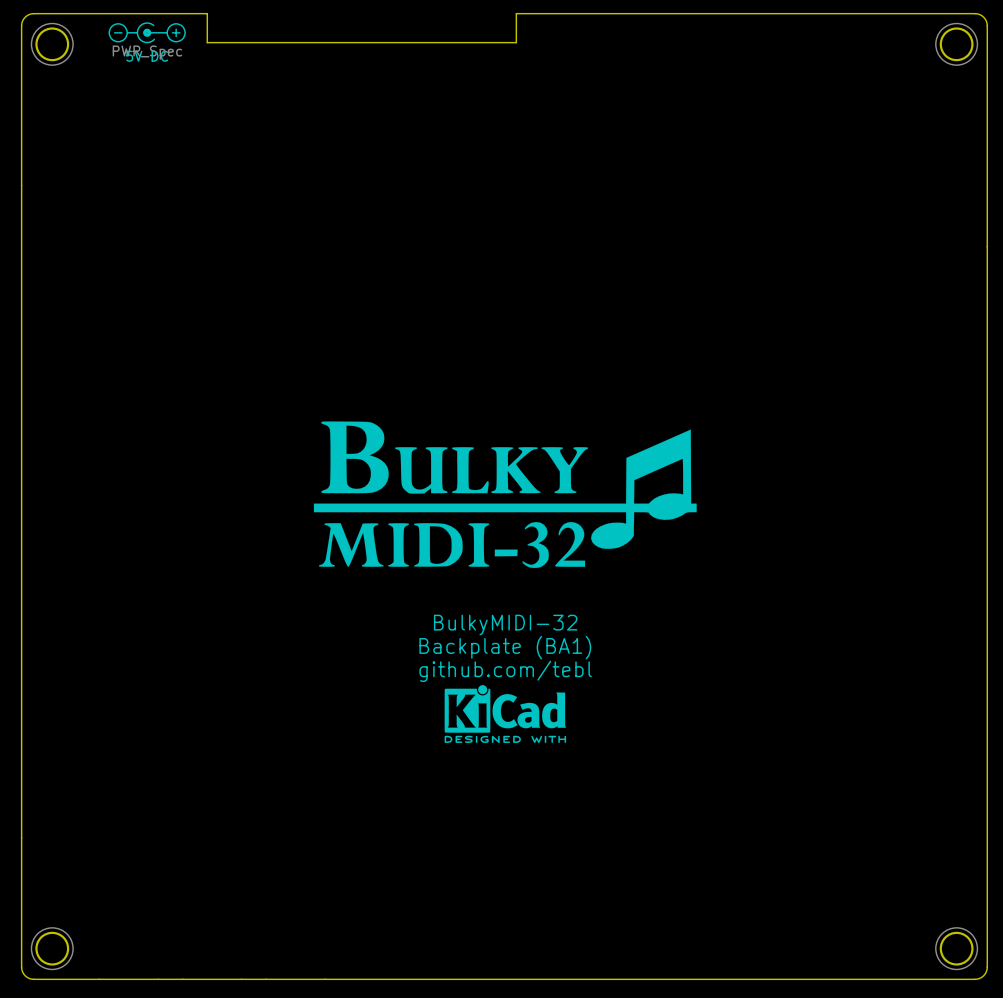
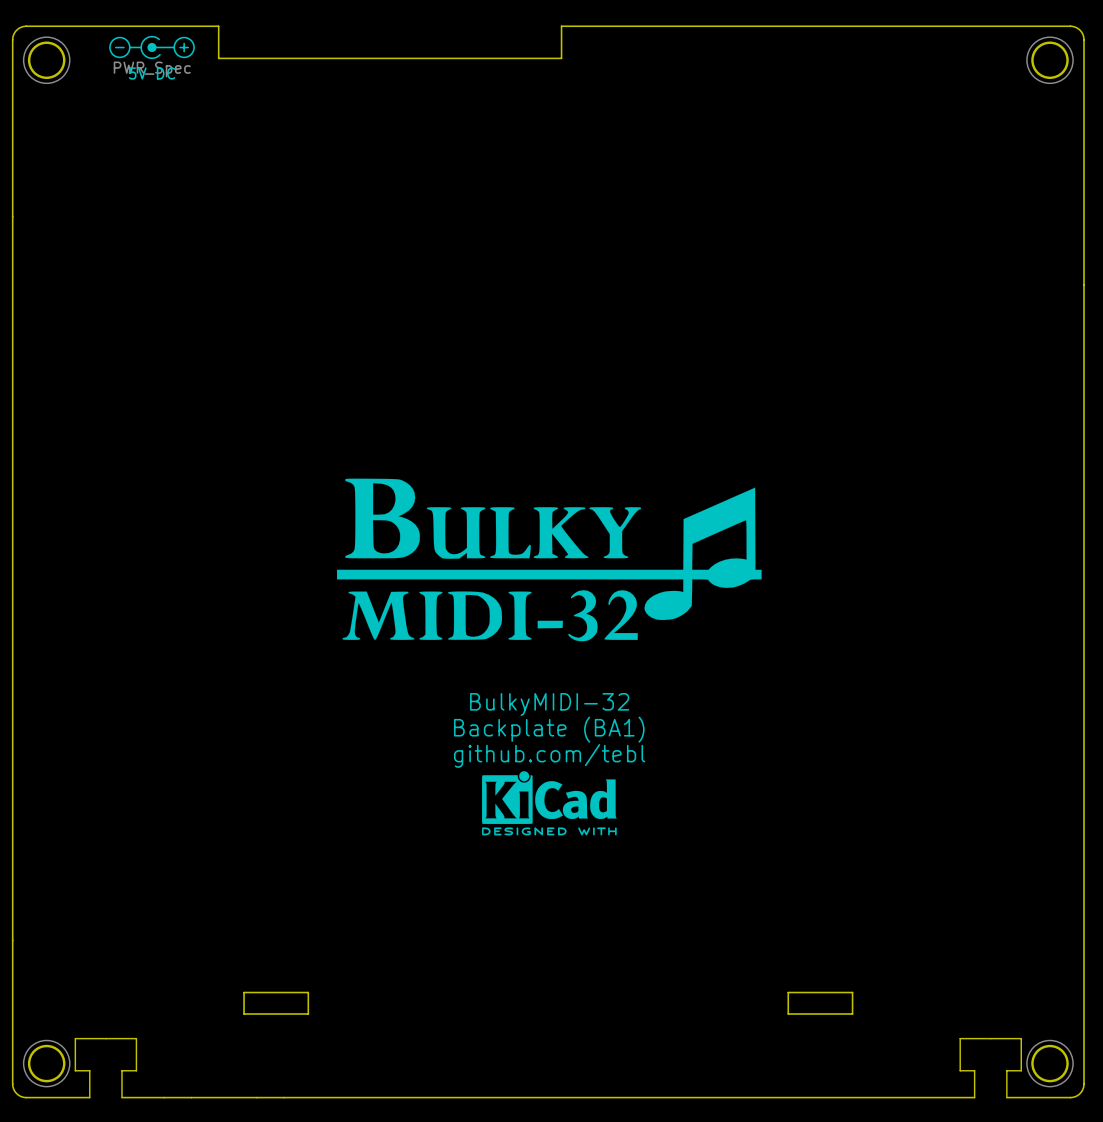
board edge: none -> (244, 992) (308, 992) (308, 1014) (244, 1014) (244, 992)
board edge: none -> (788, 992) (852, 992) (852, 1014) (788, 1014) (788, 992)
board edge: (91, 979) (120, 979) -> (89, 1097) (89, 1070) (75, 1070) (75, 1038) (136, 1038) (136, 1070) (121, 1070) (121, 1097)
board edge: (888, 979) (917, 979) -> (974, 1097) (974, 1070) (960, 1070) (960, 1038) (1021, 1038) (1021, 1070) (1006, 1070) (1006, 1097)

